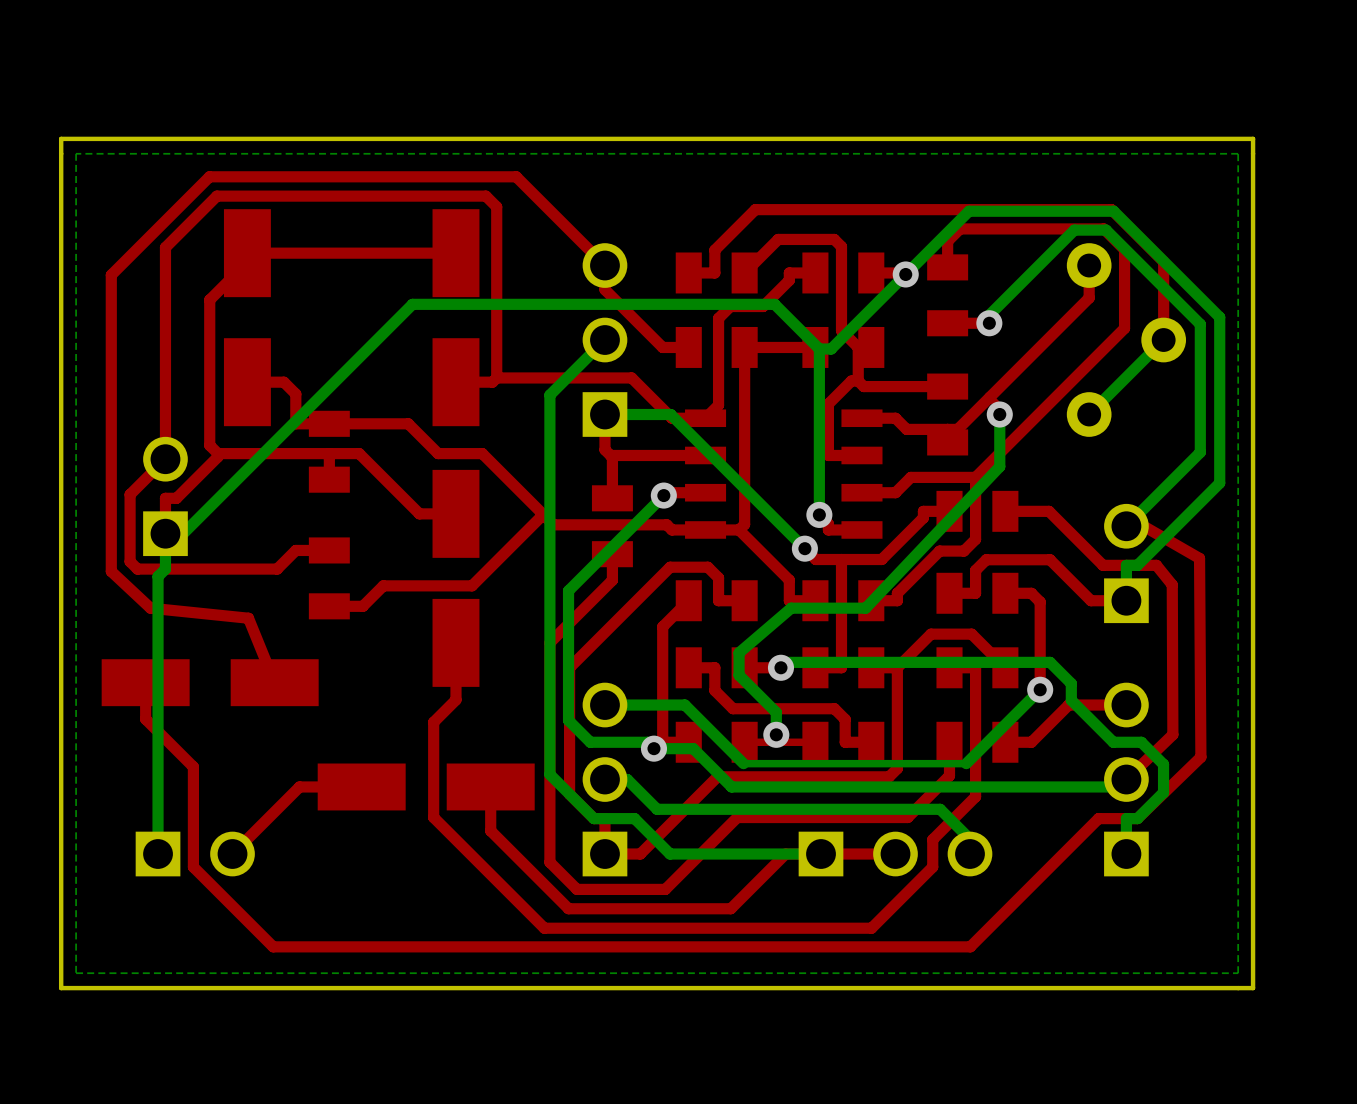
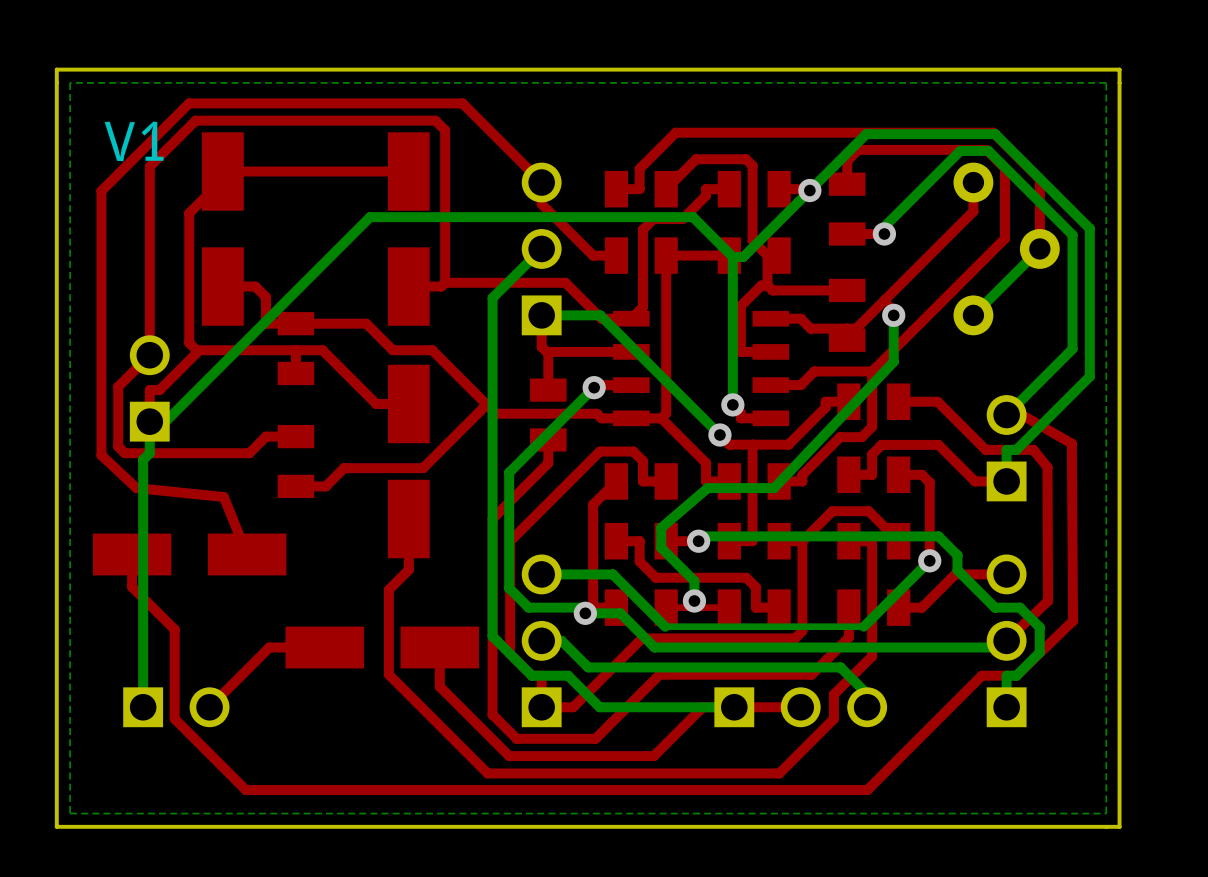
text: none -> V1 (134, 141)

